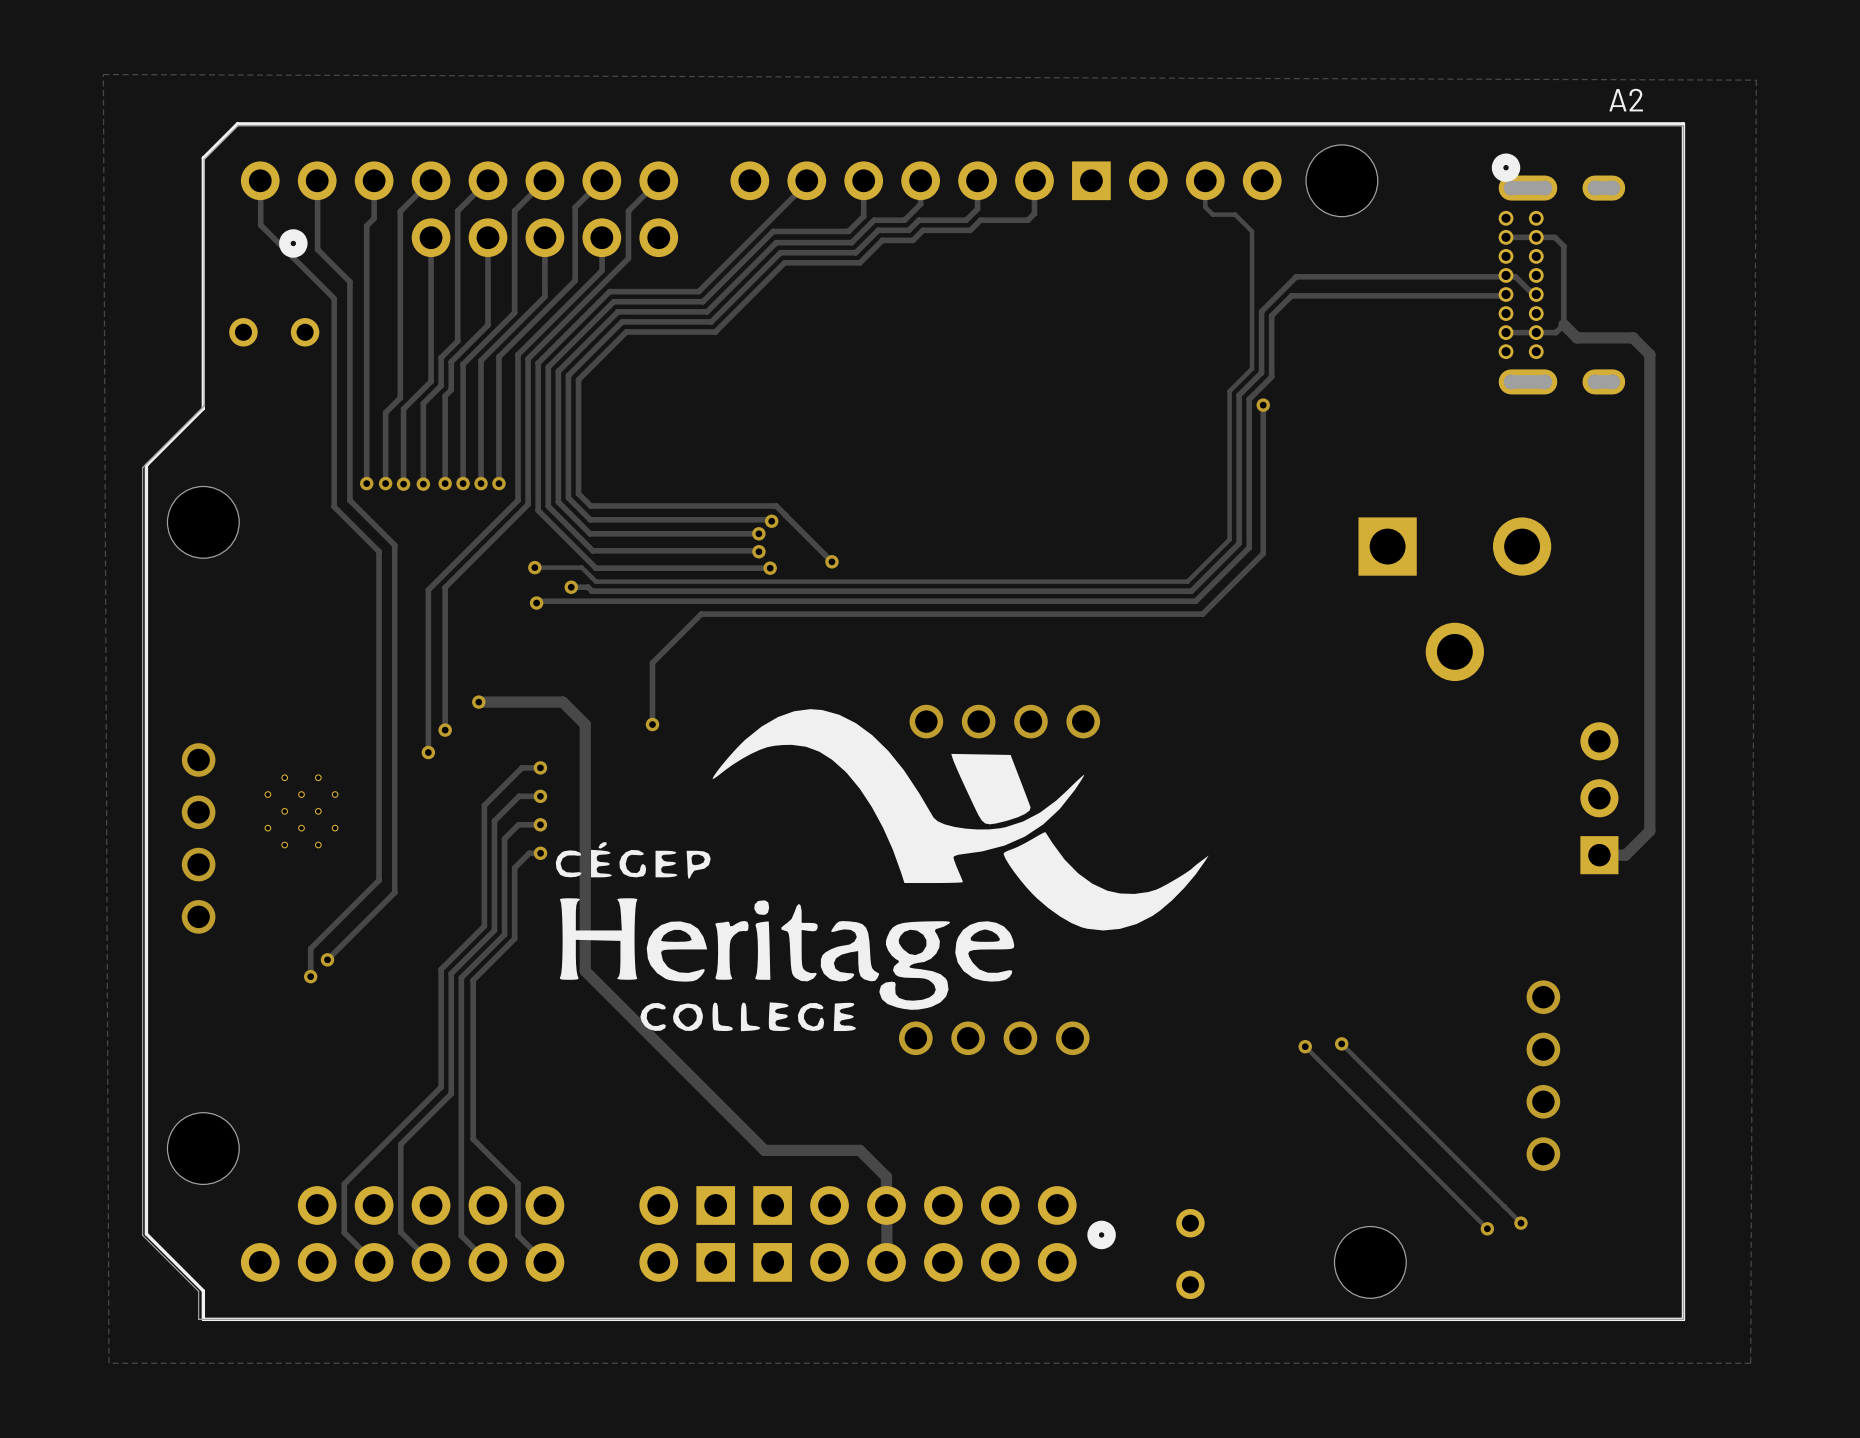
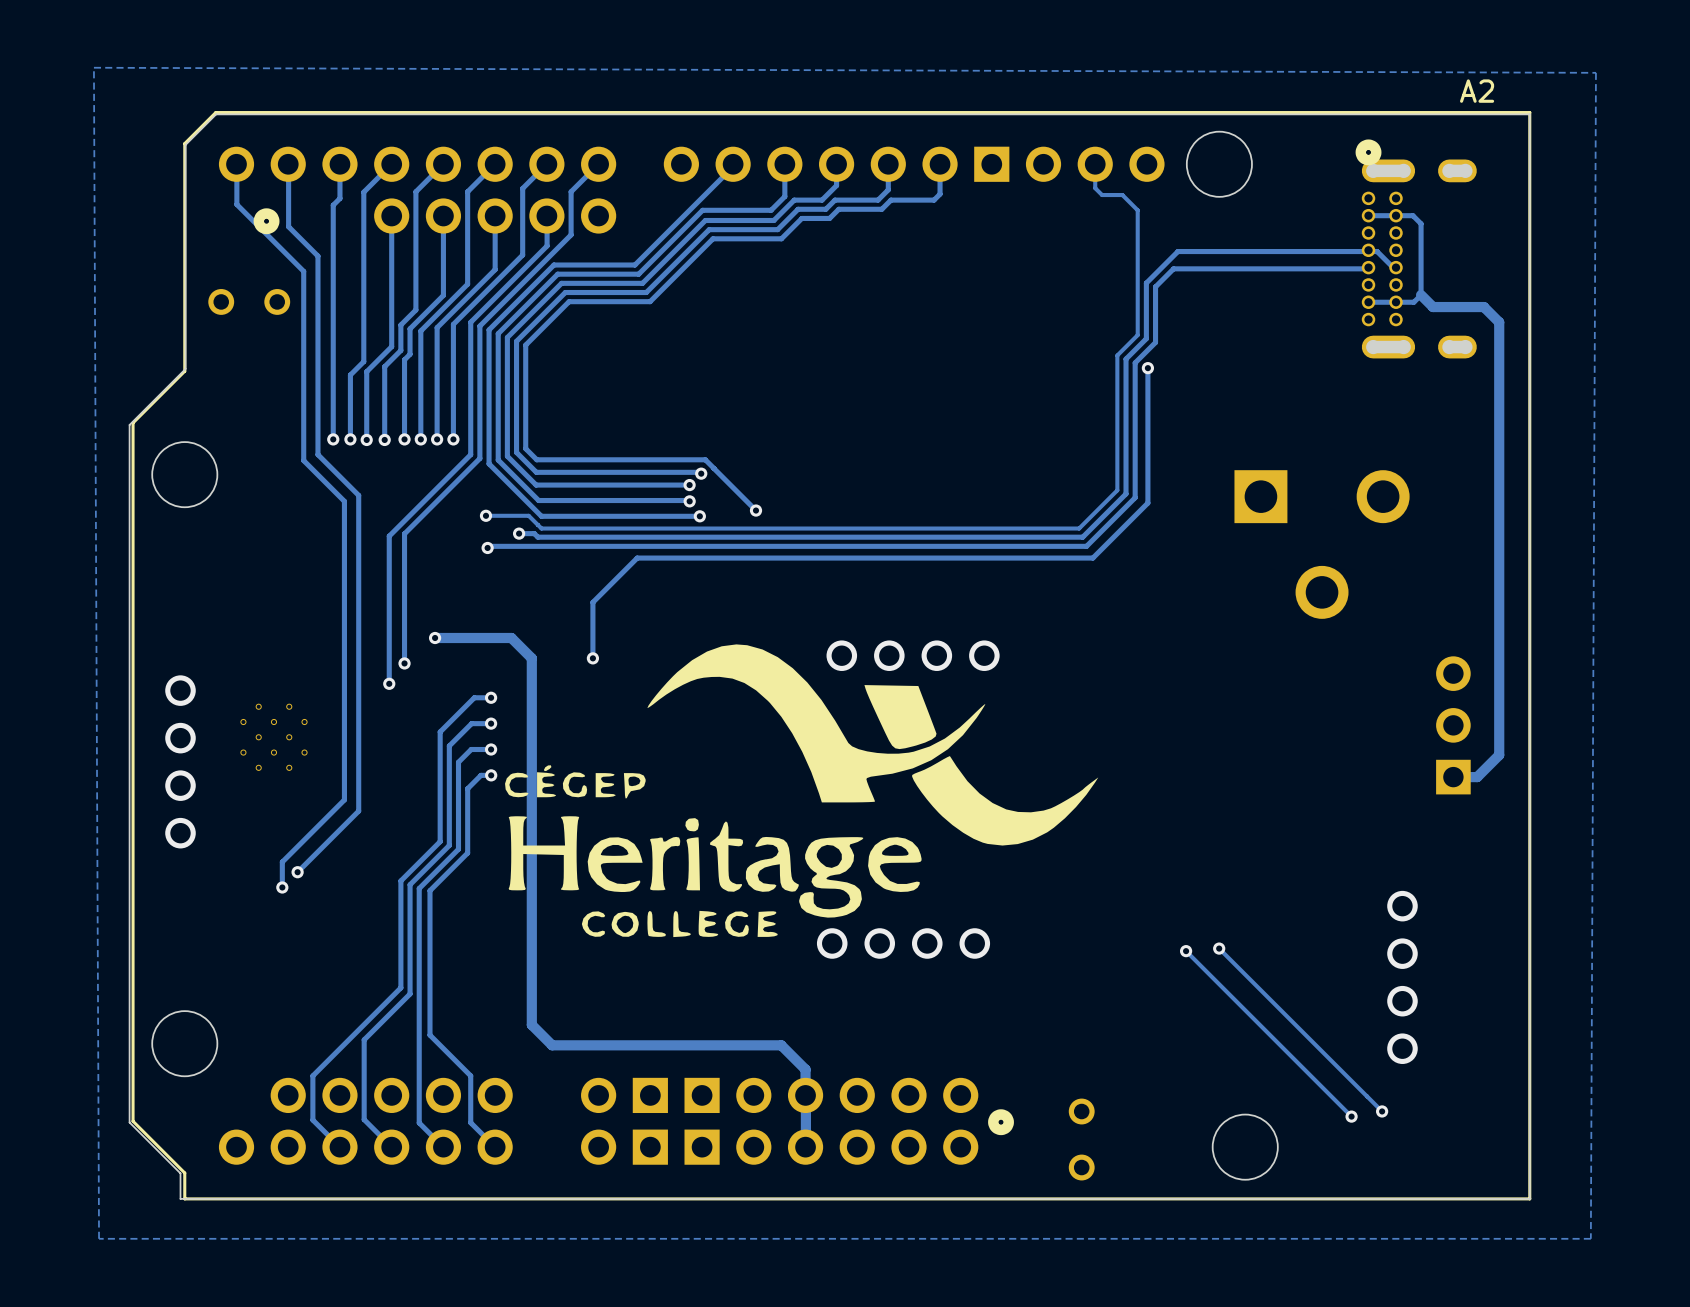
track: (585, 971) (764, 1150) -> (531, 882) (531, 1024) (552, 1045) (694, 1045)

